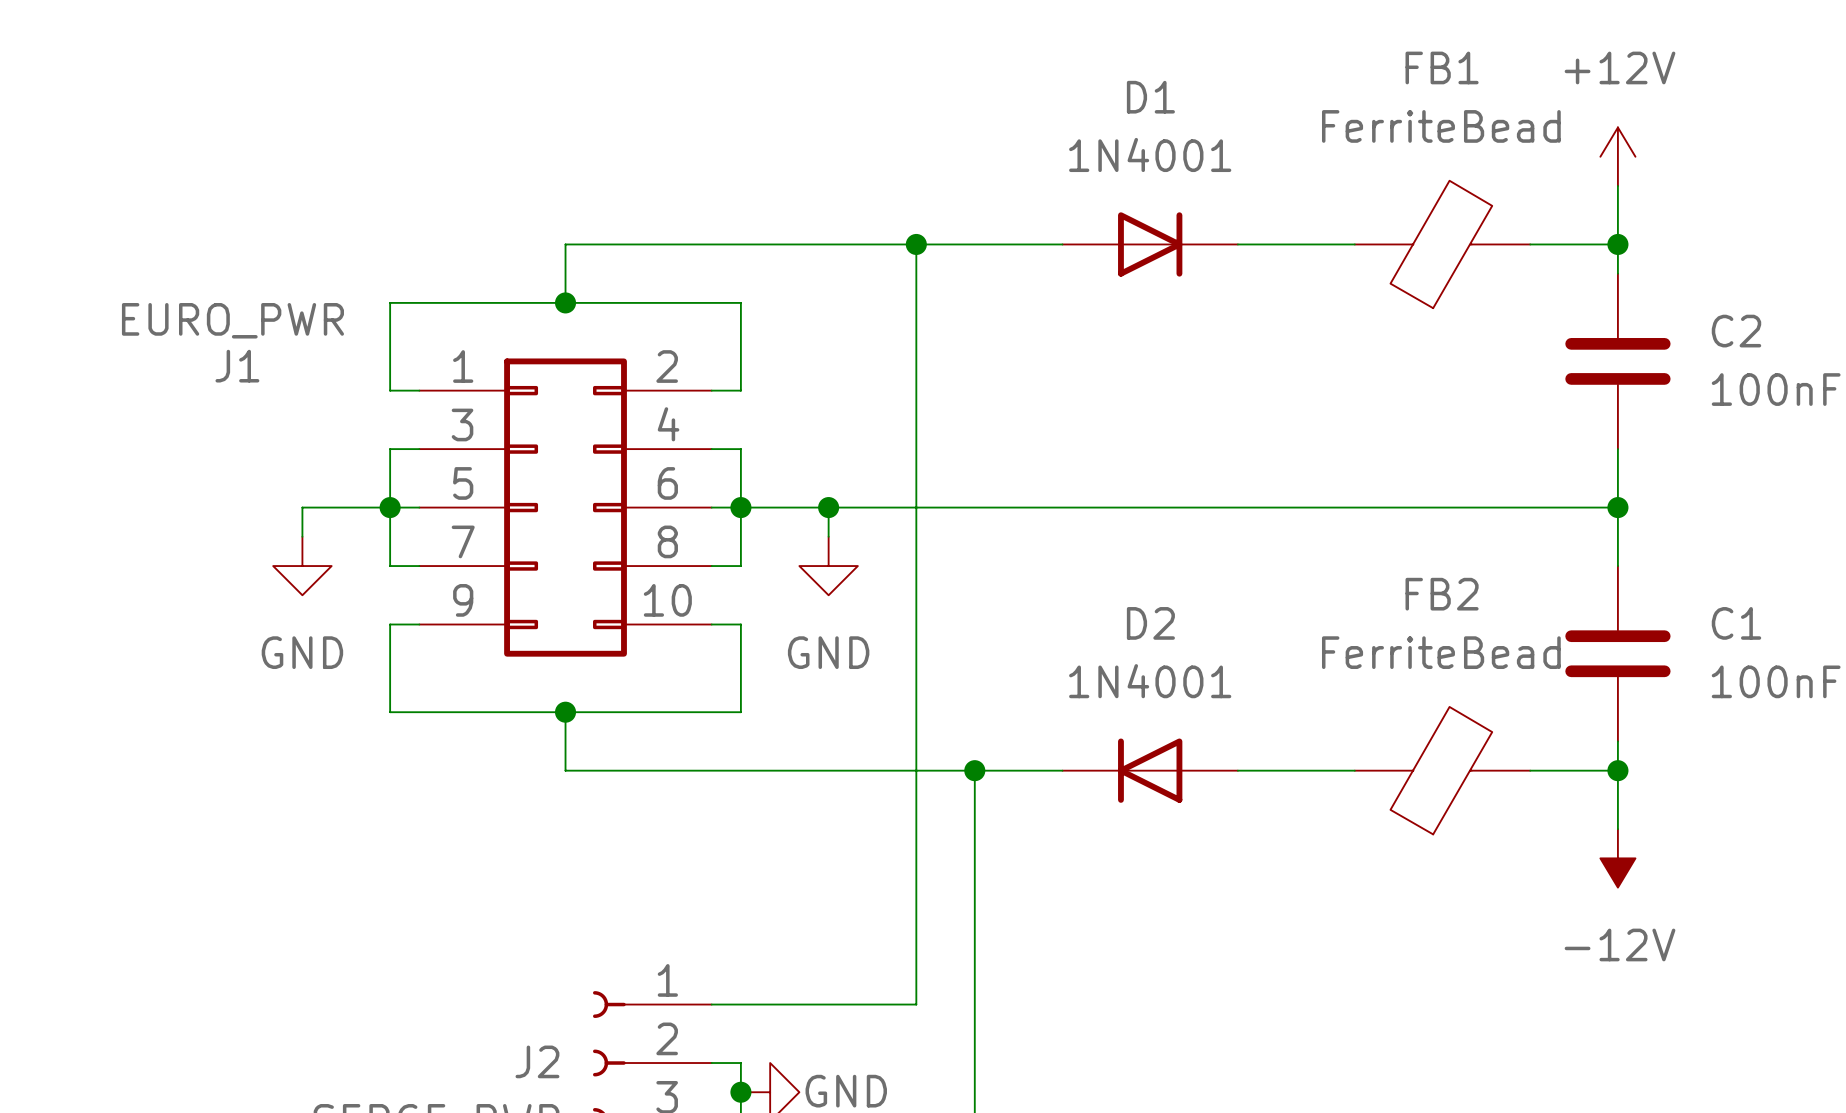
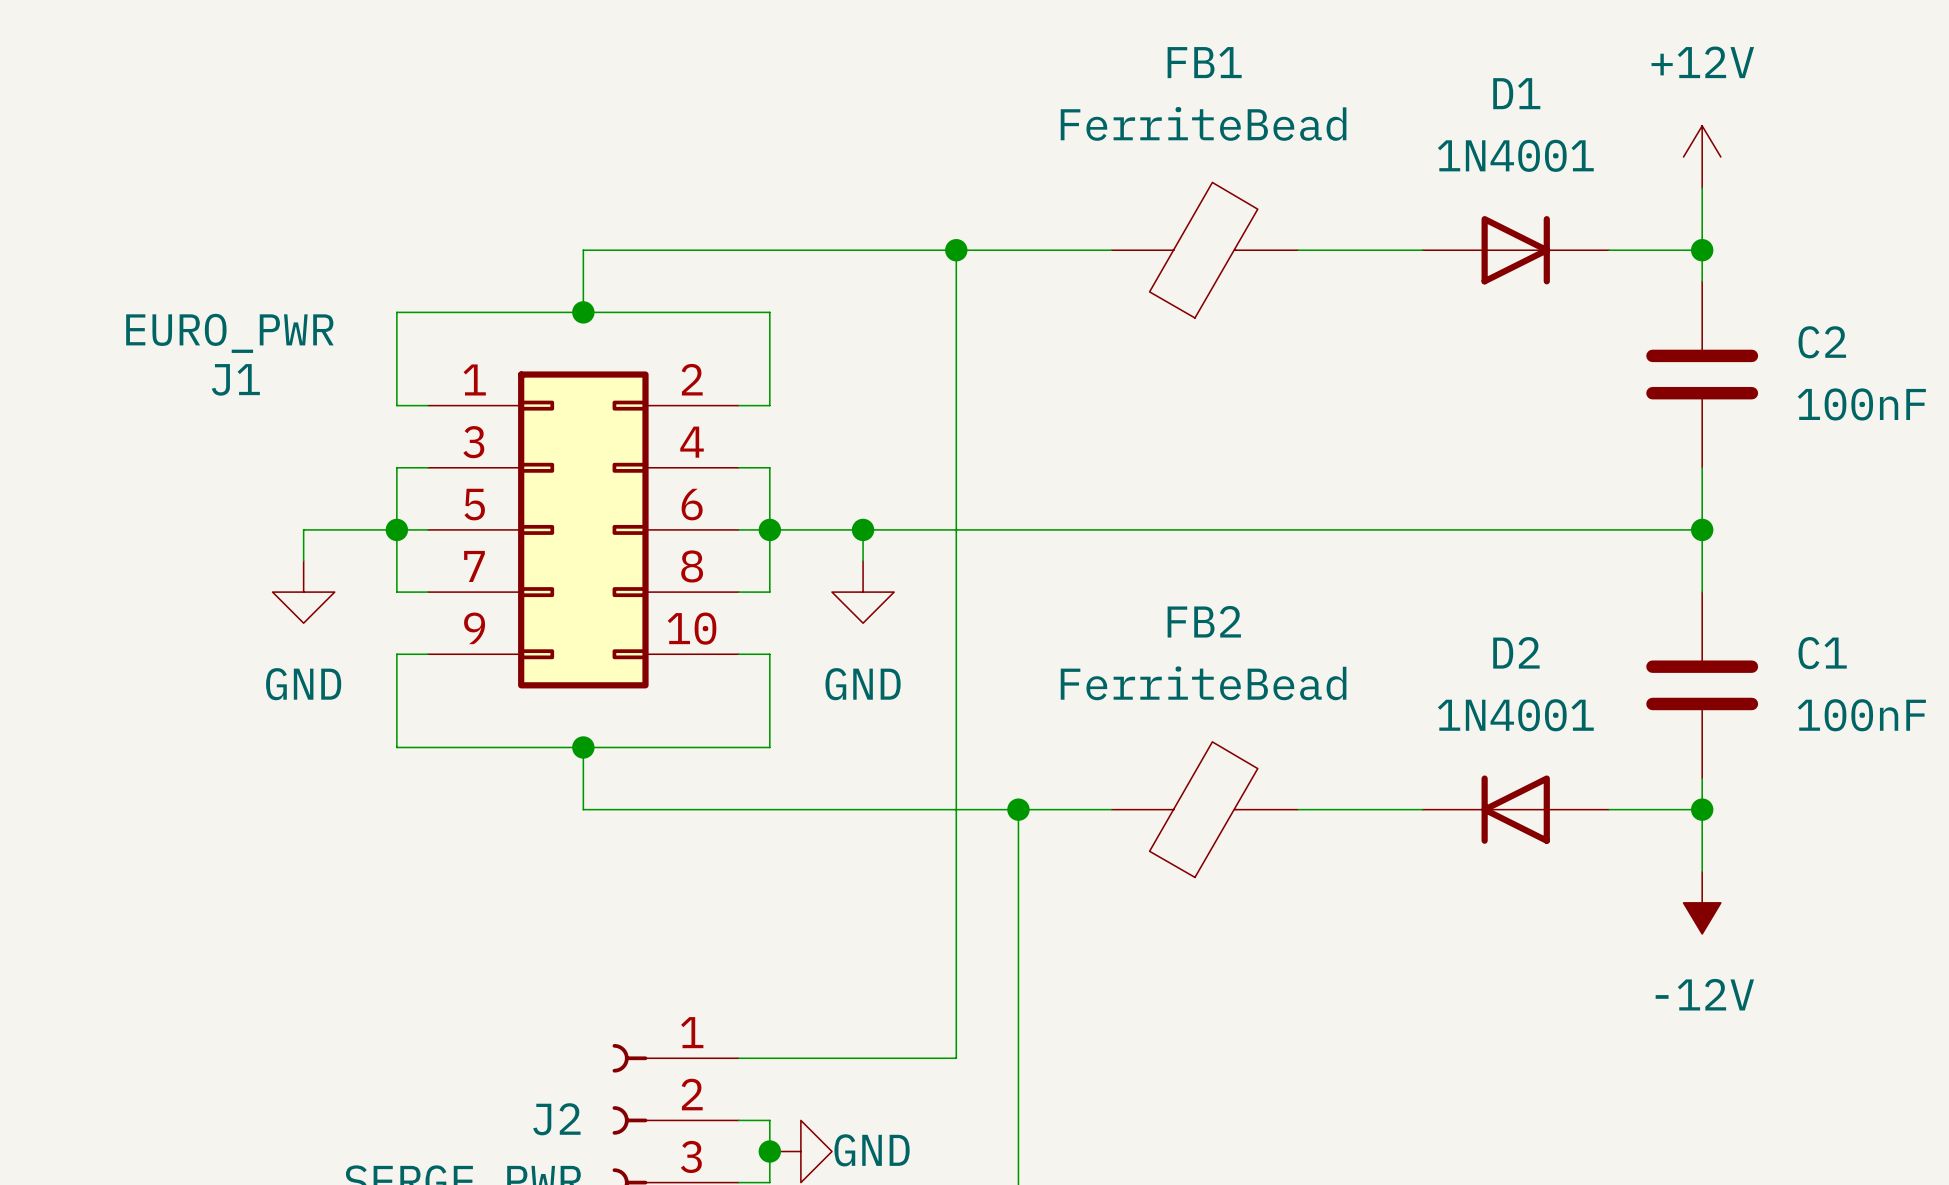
D1 position: (1150, 244) -> (1515, 250)
FB1 position: (1442, 244) -> (1204, 250)
D2 position: (1150, 770) -> (1515, 809)
FB2 position: (1442, 770) -> (1204, 809)

